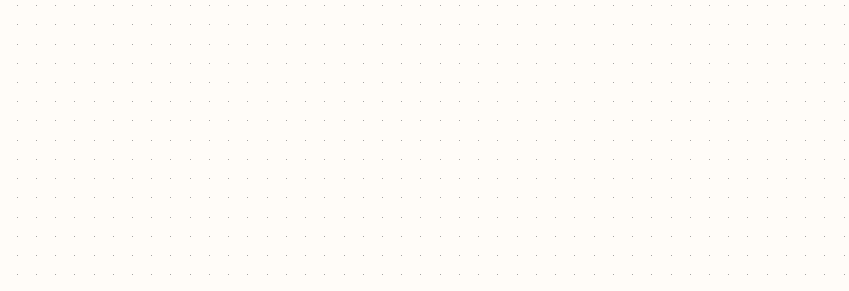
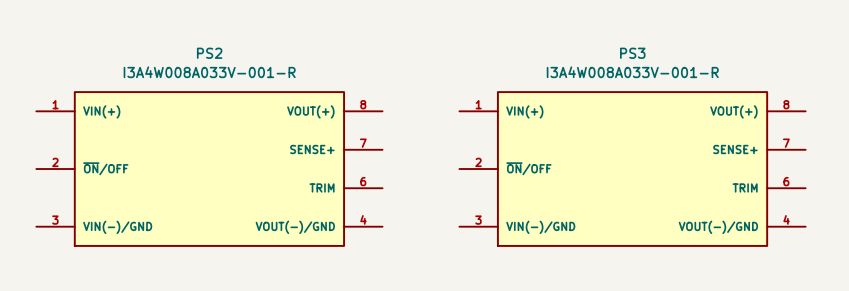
PS2: none -> I3A4W008A033V-001-R (209, 169)
PS3: none -> I3A4W008A033V-001-R (632, 169)

